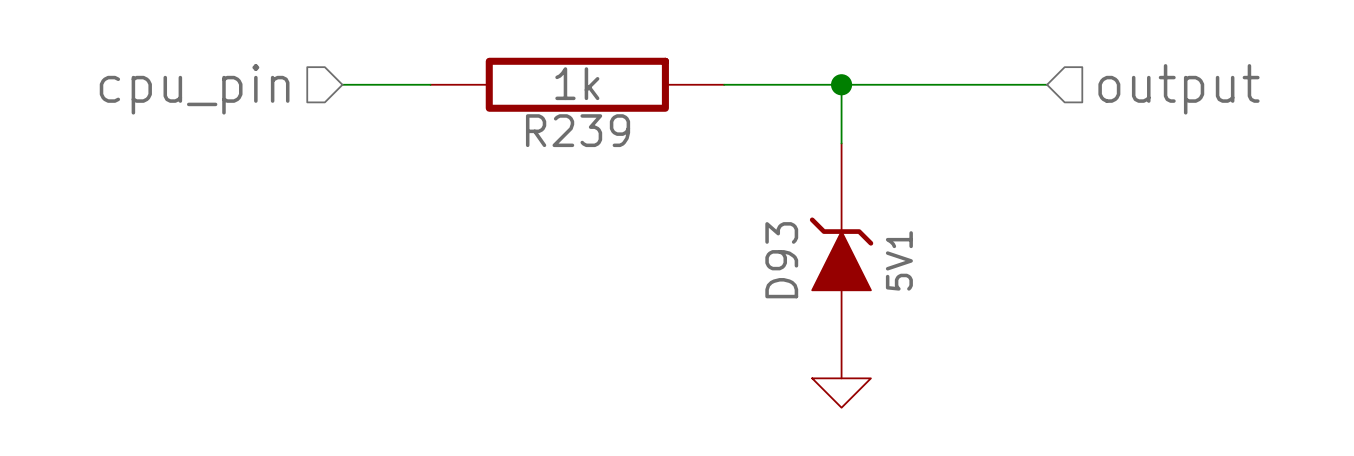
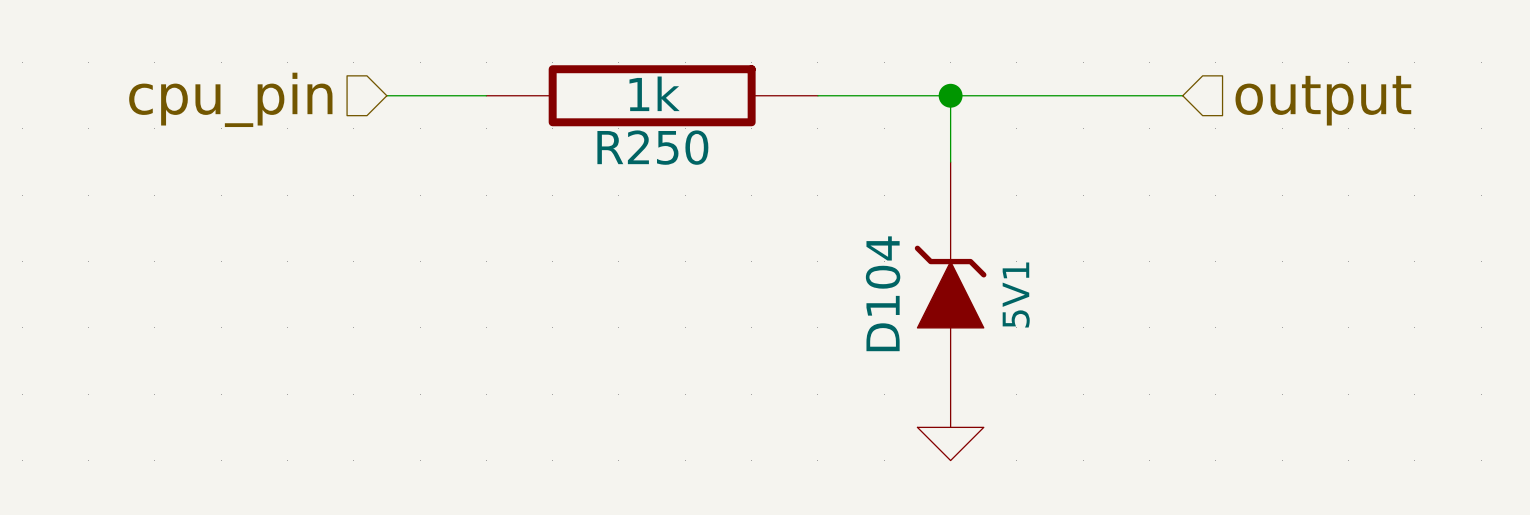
R239 name: R239 (578, 130) -> R250 (652, 147)
D93 name: D93 (781, 260) -> D104 (883, 293)

